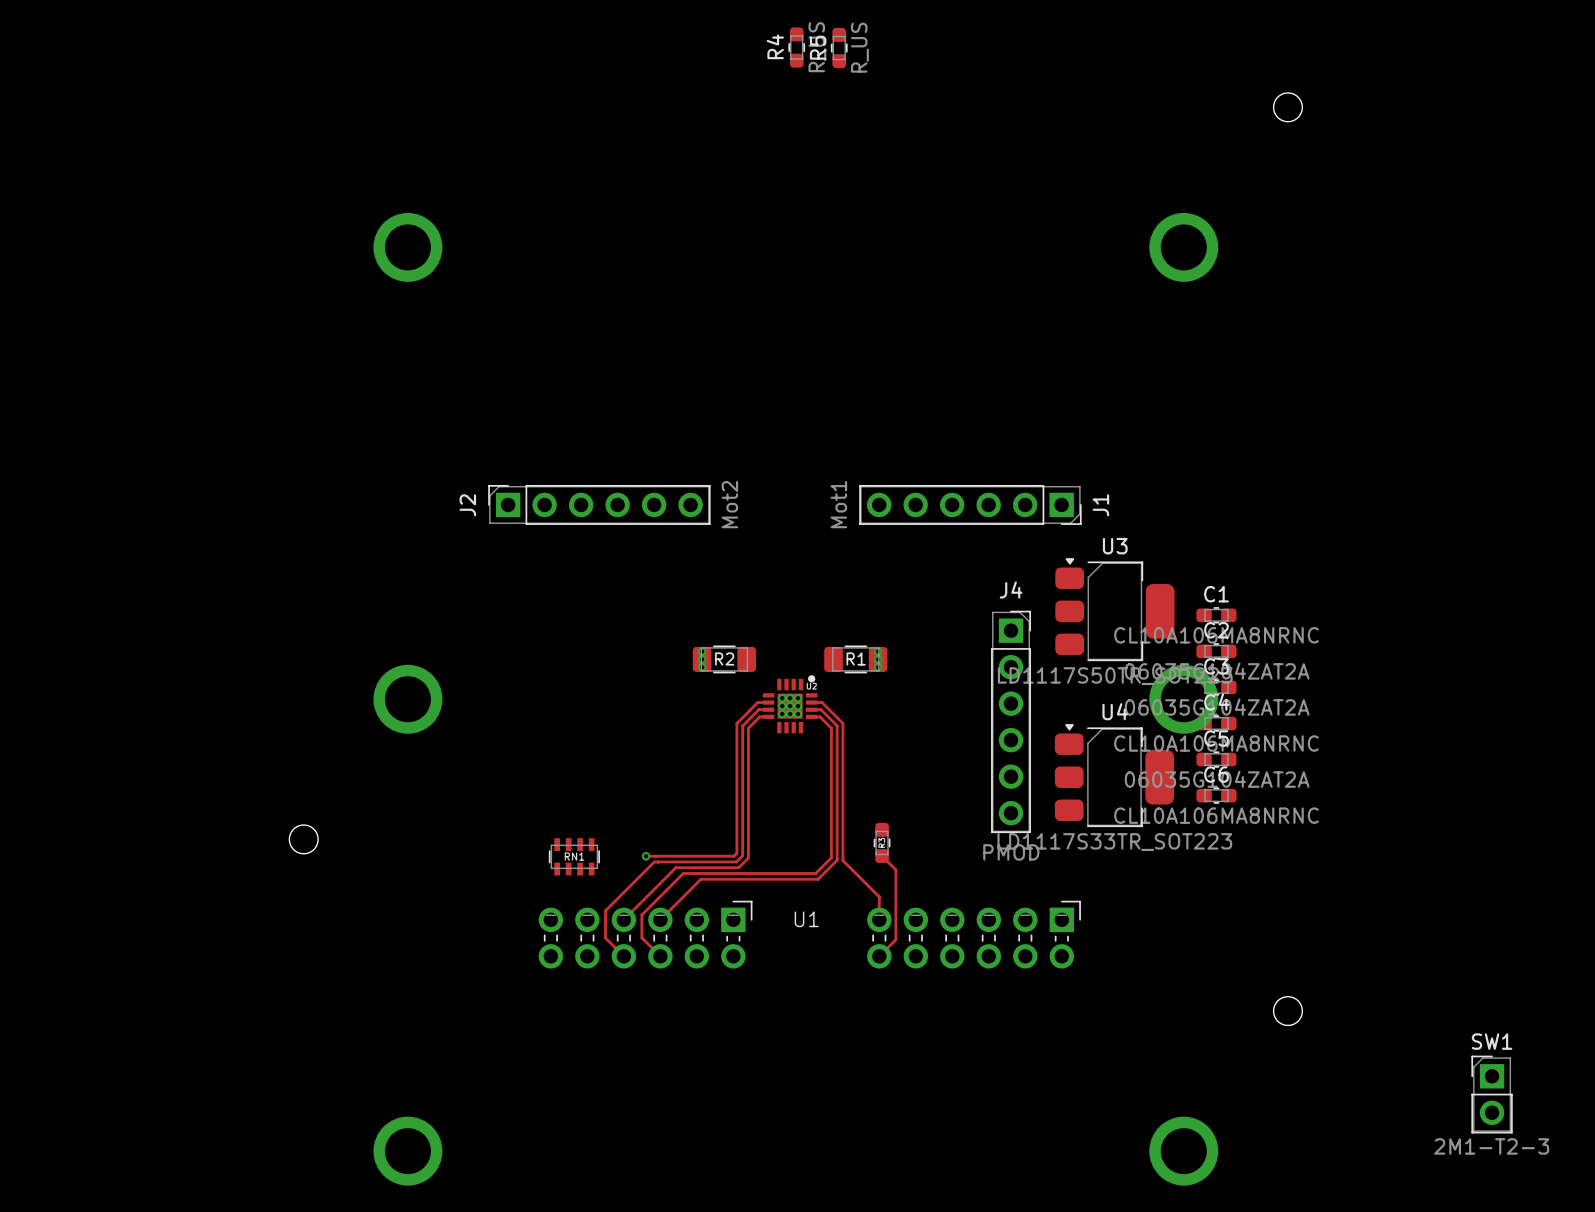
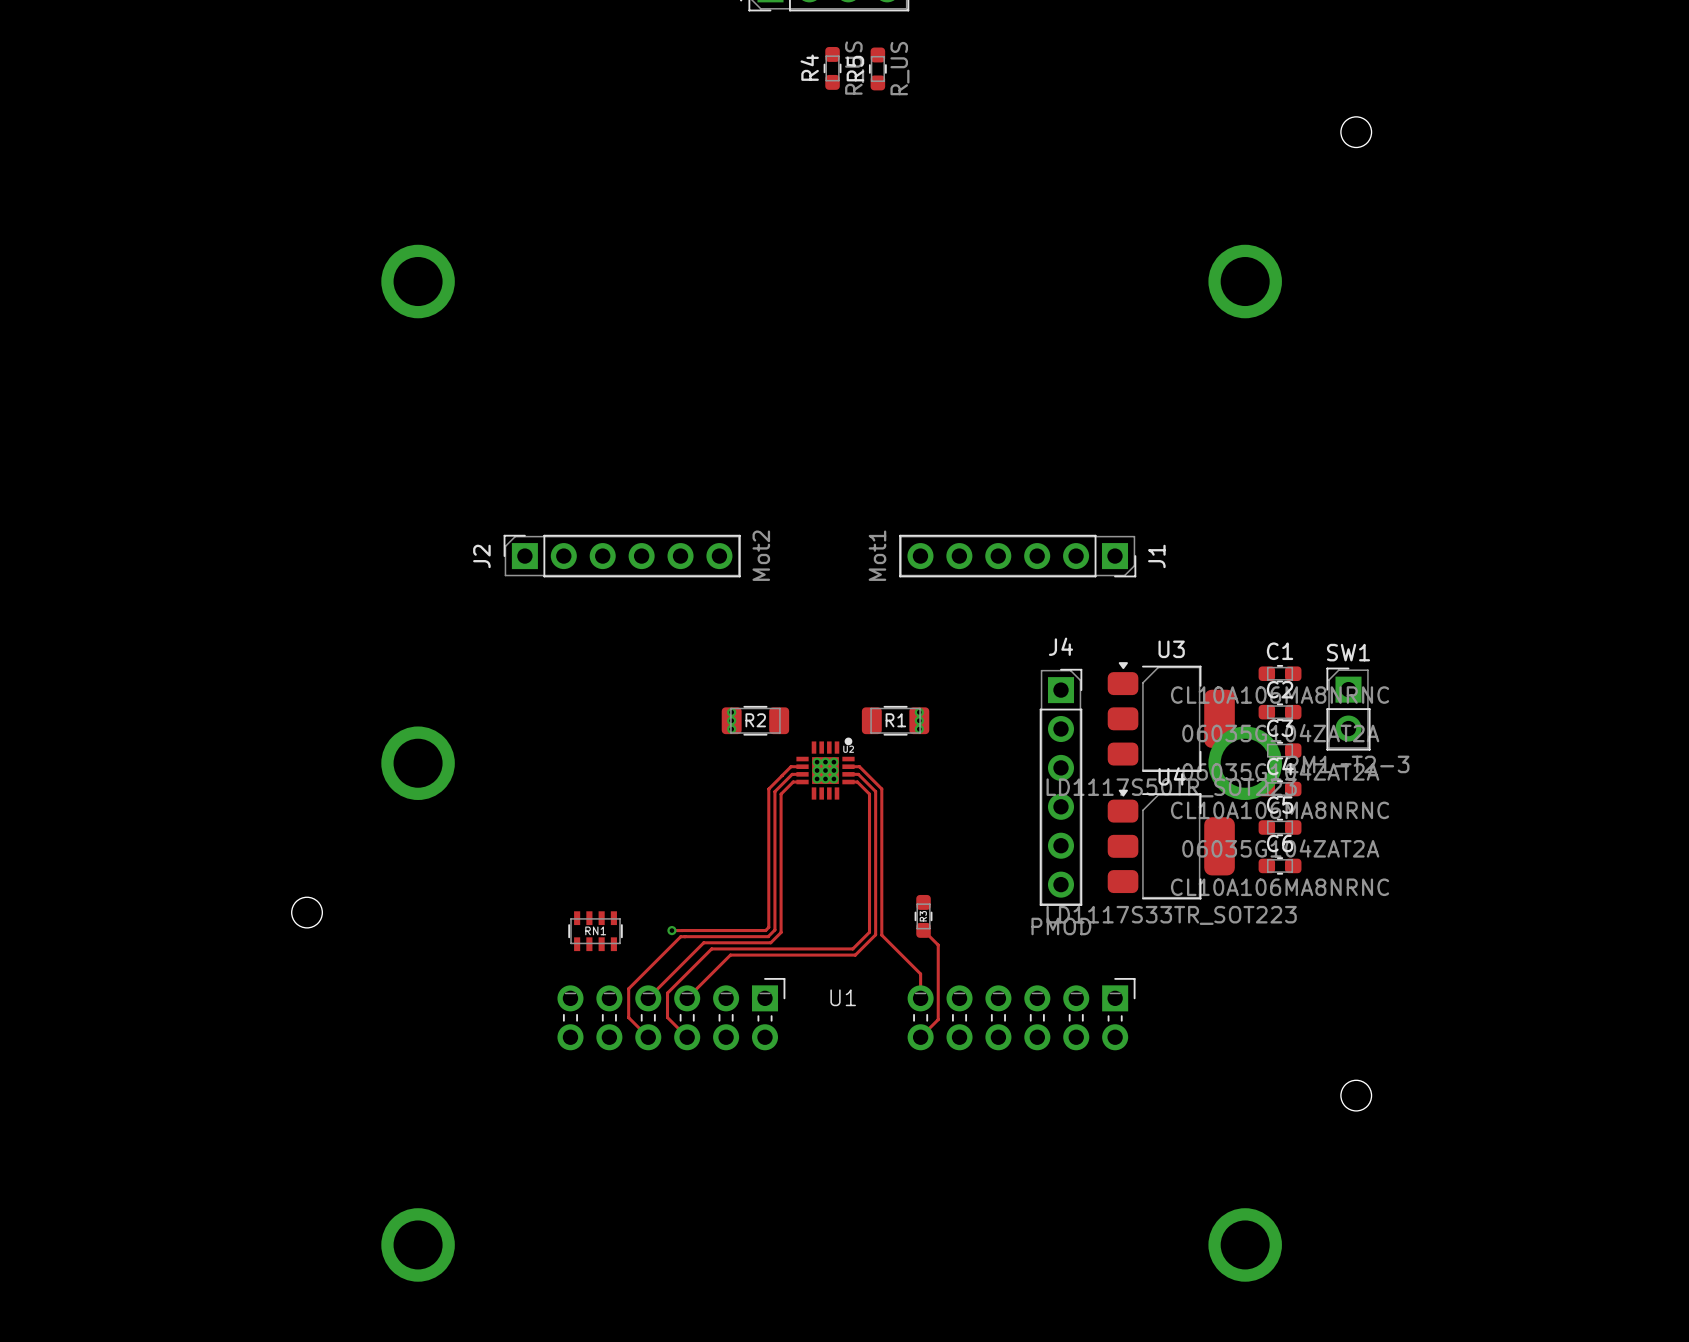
U3 position: (1114, 609) -> (1171, 717)
SW1 position: (1492, 1094) -> (1348, 709)

